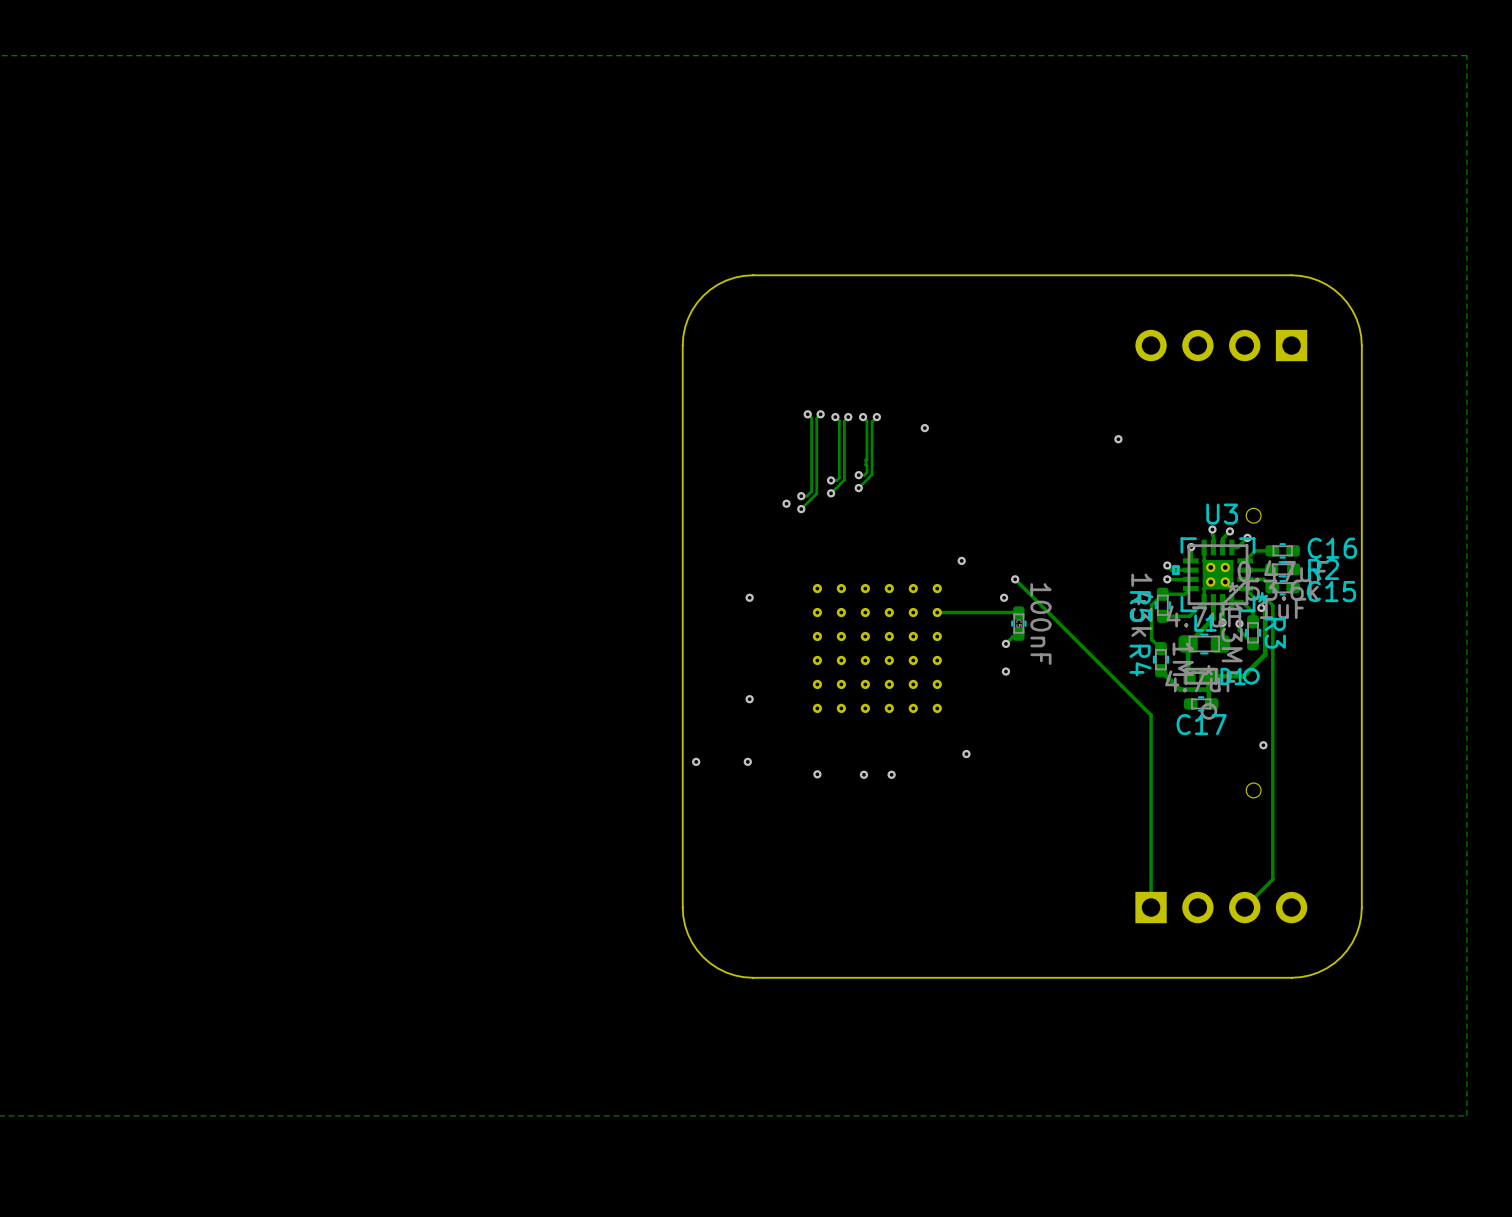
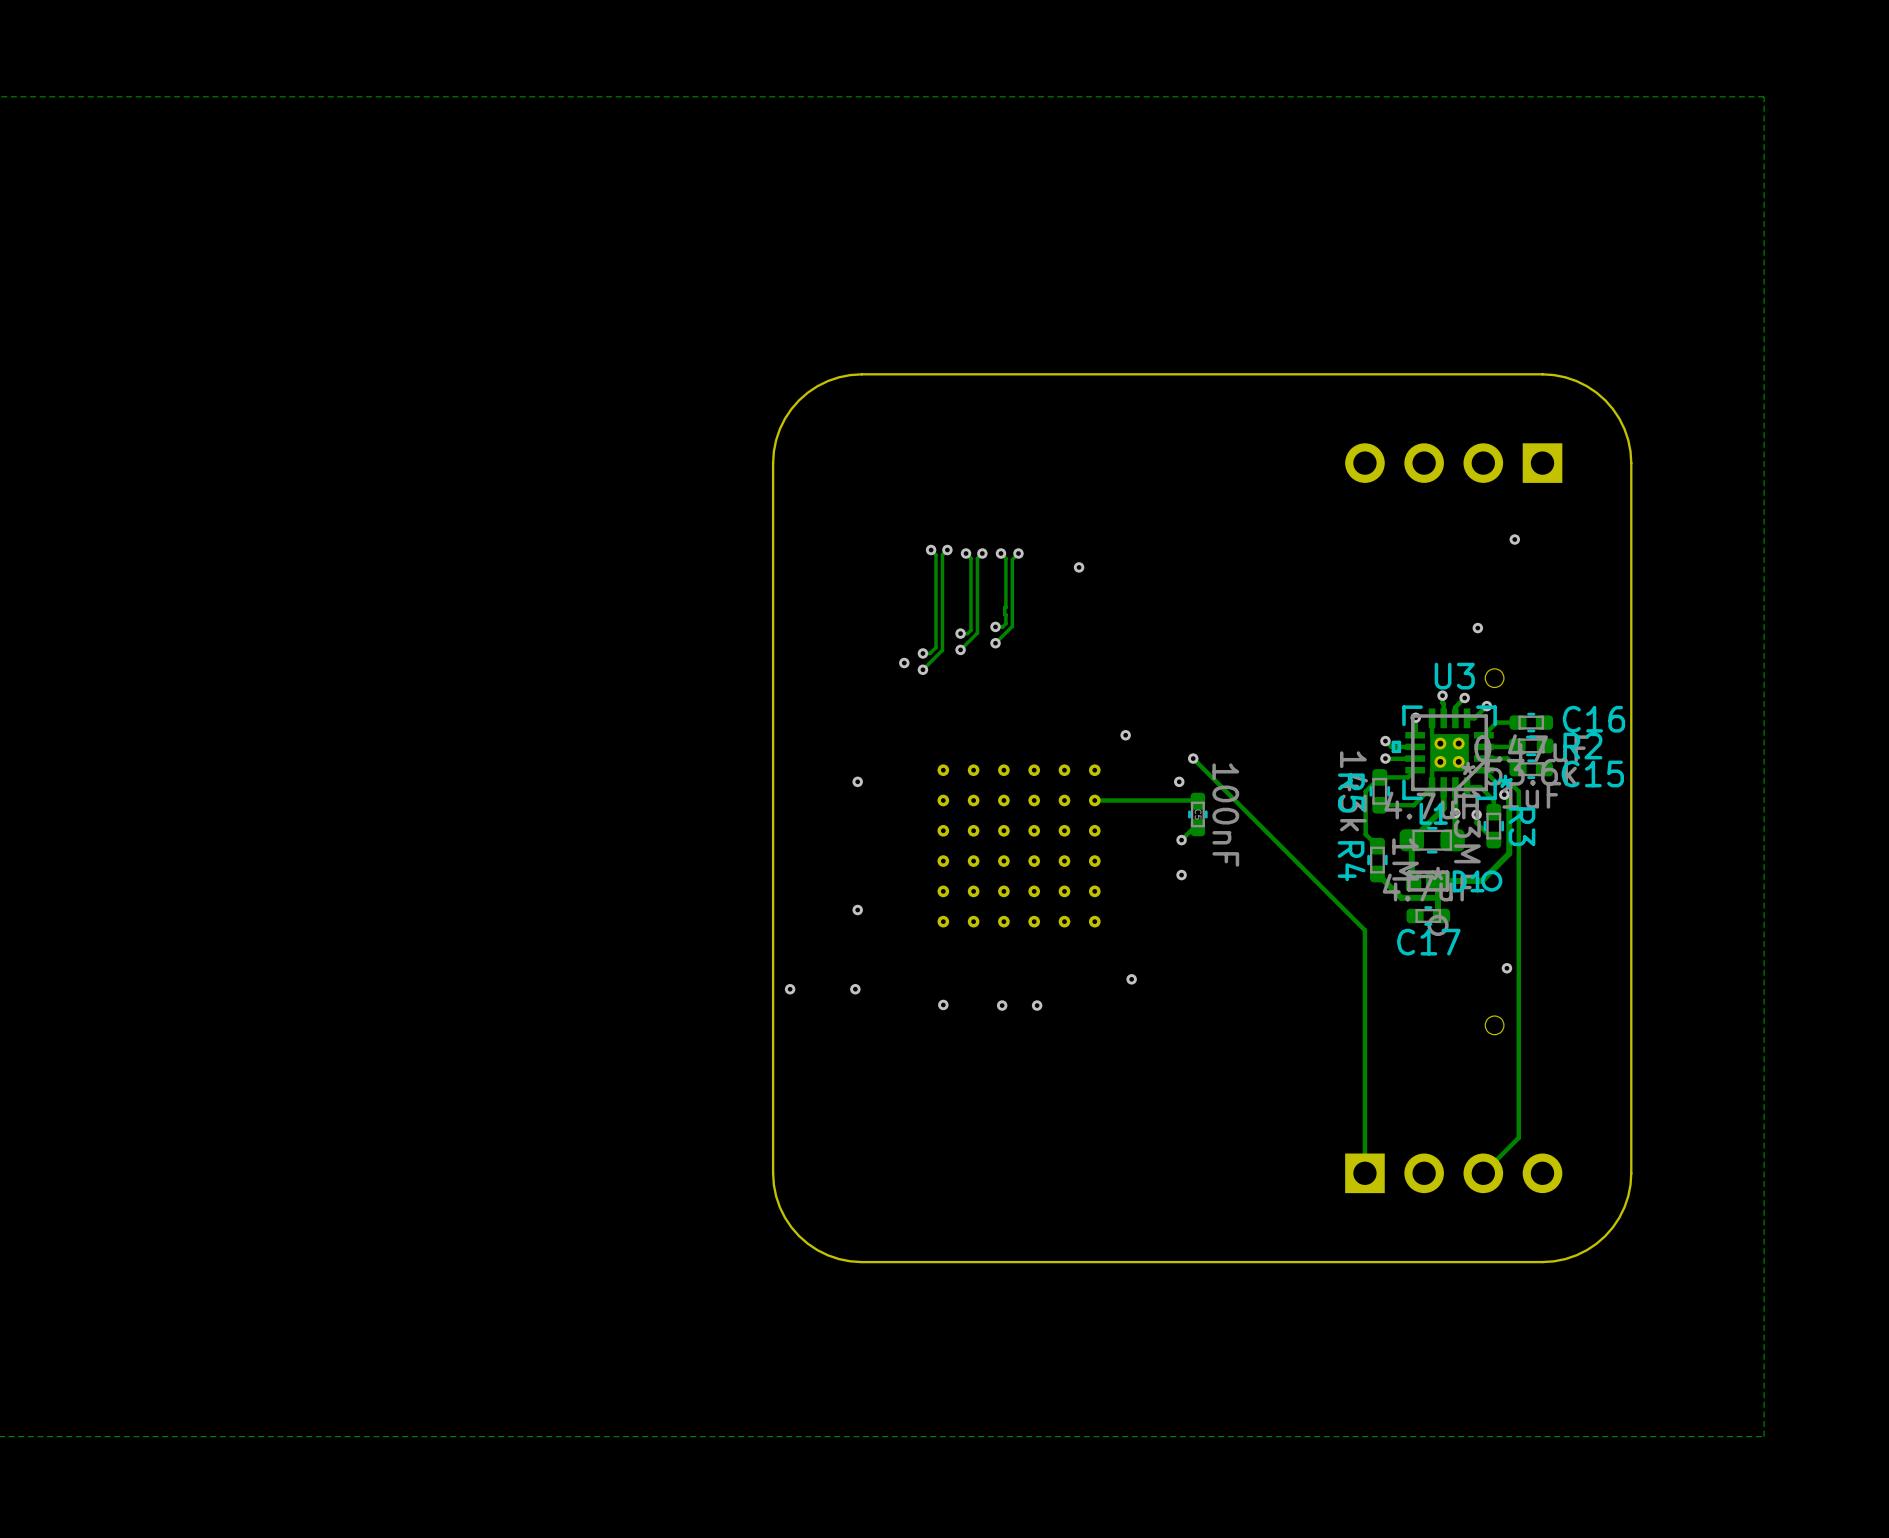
via: none -> (1514, 539)
via: (1118, 439) -> none
via: none -> (1477, 628)

